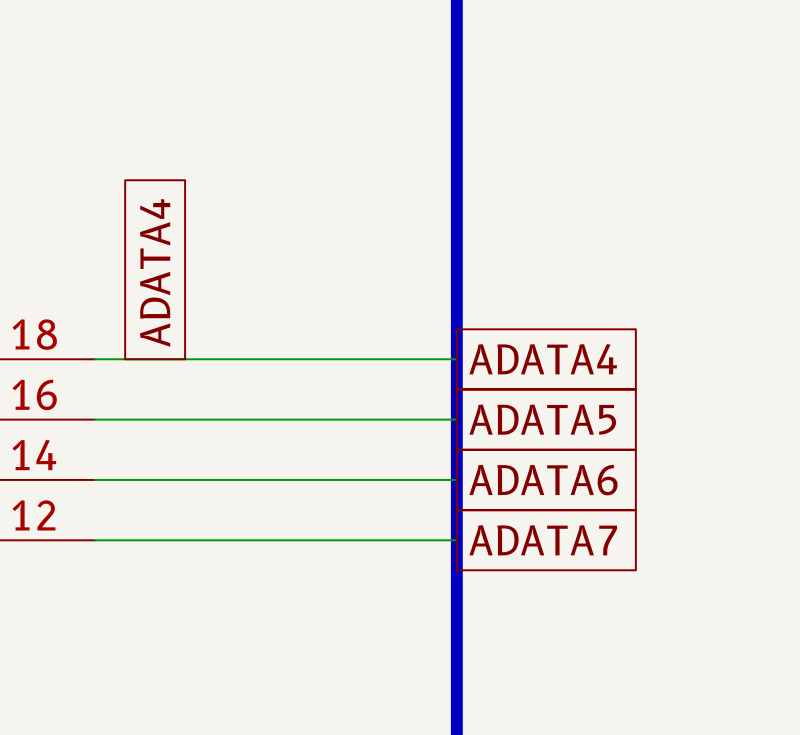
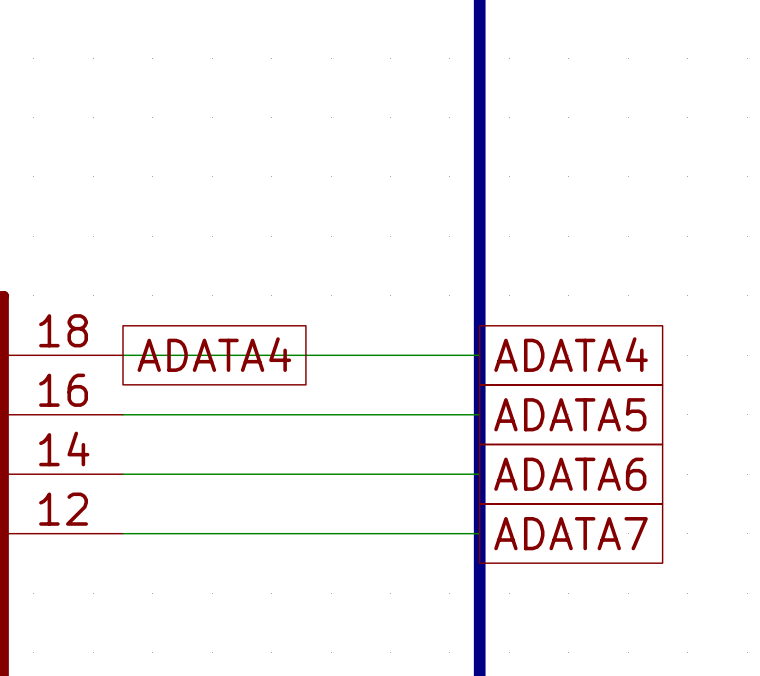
global label rotation: 0° (155, 272) -> 90° clockwise (214, 354)

